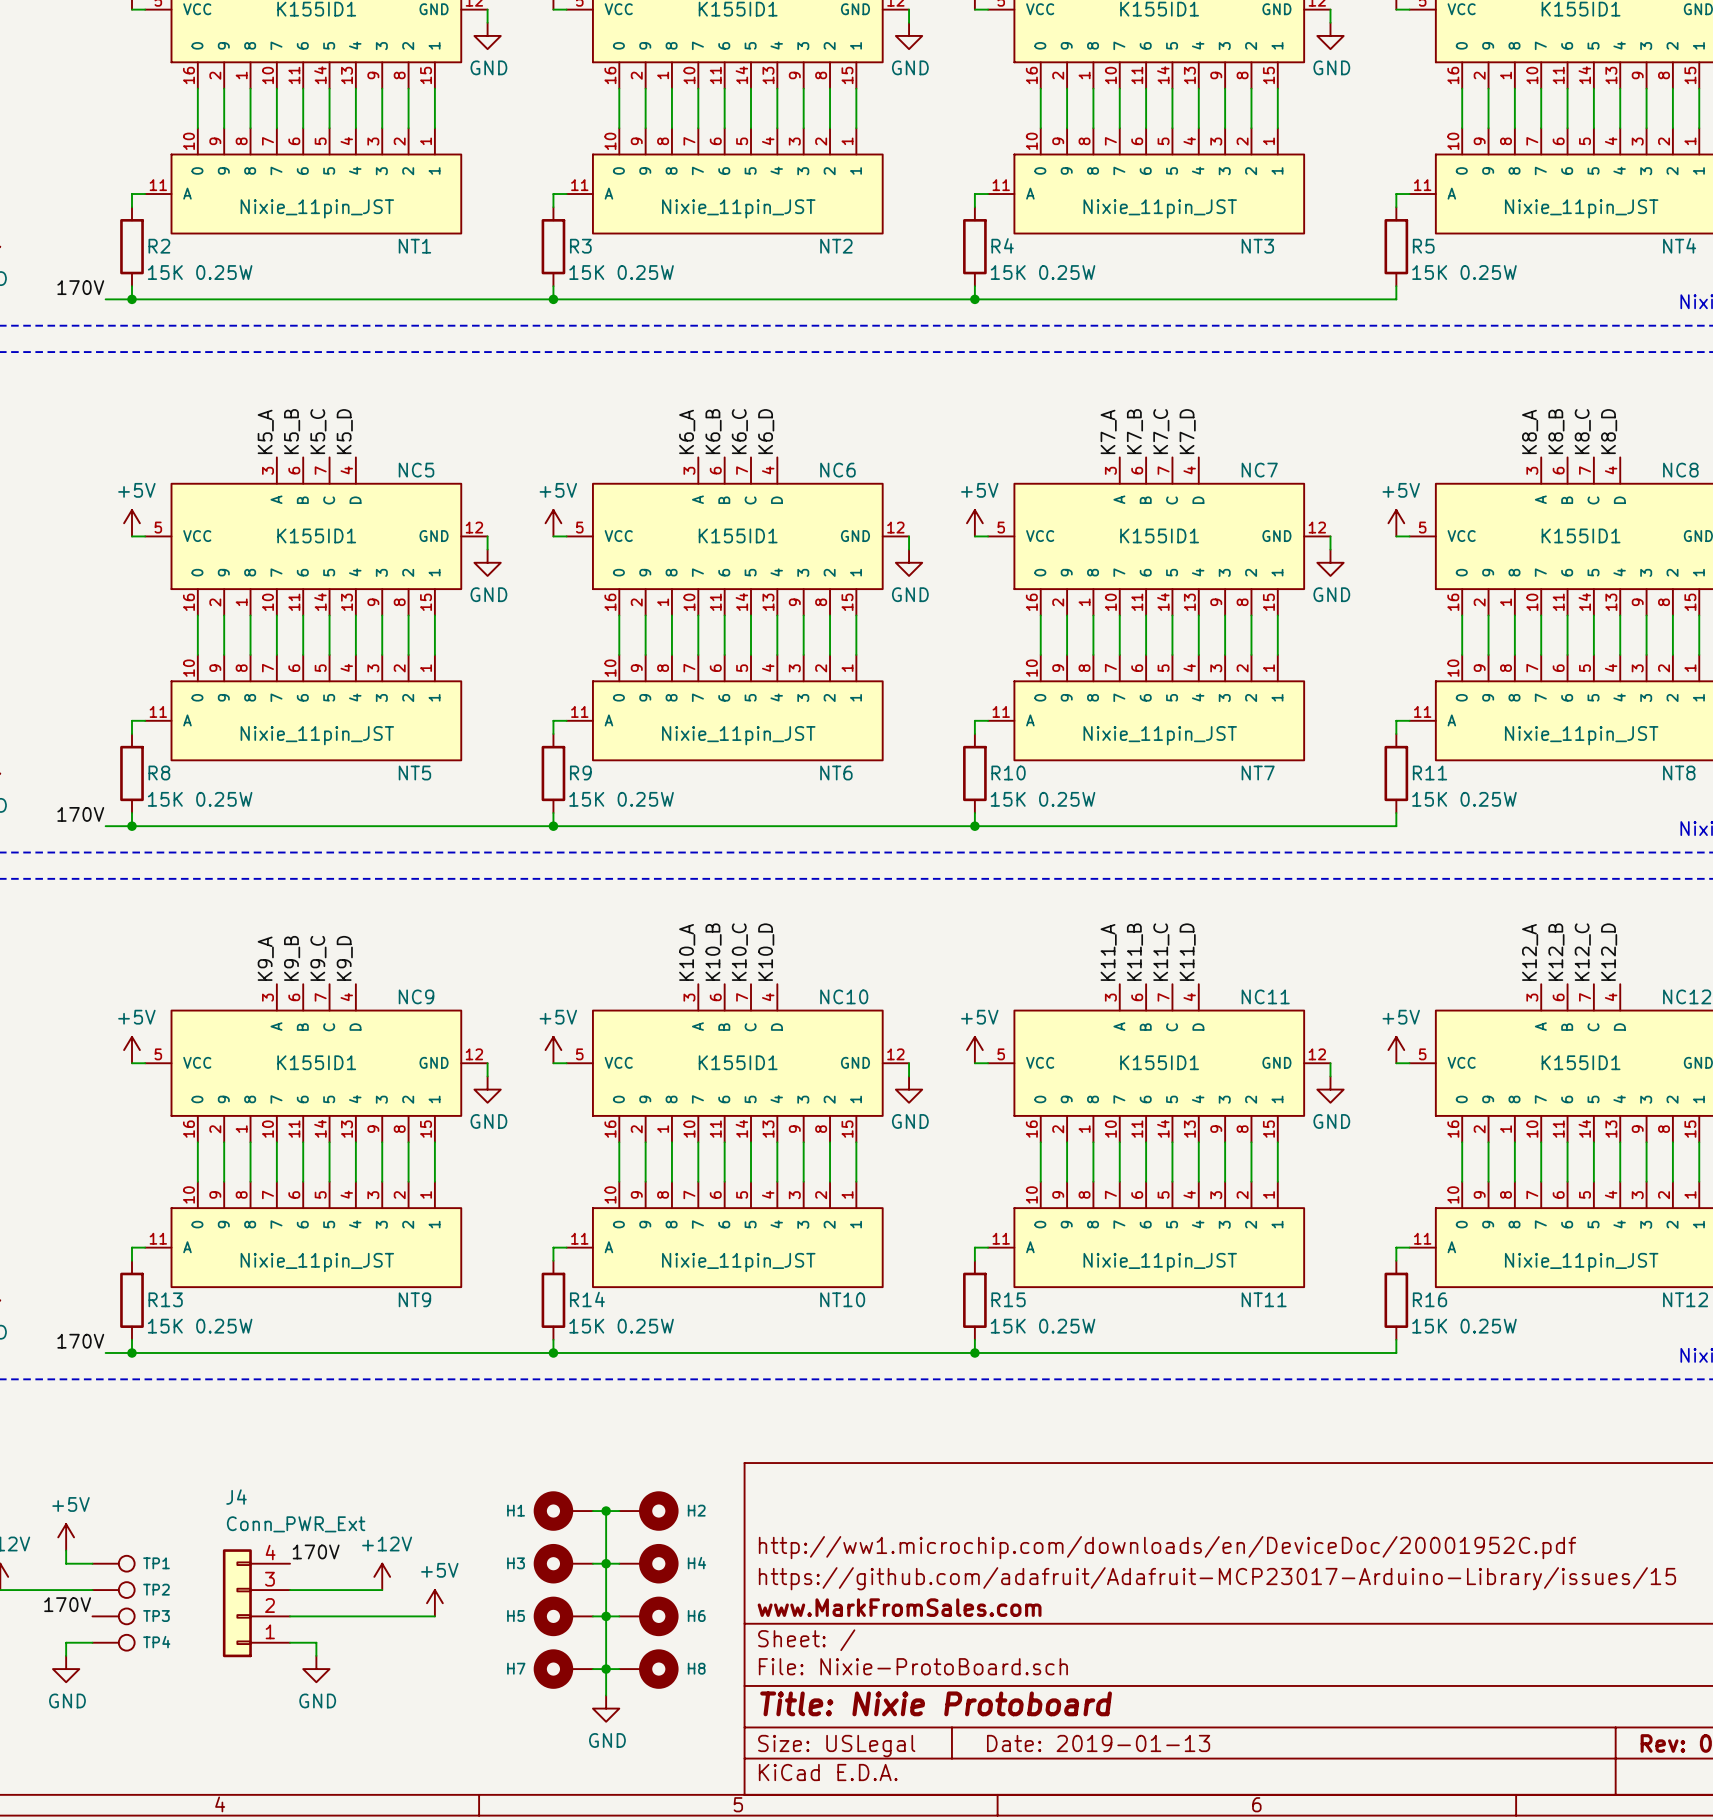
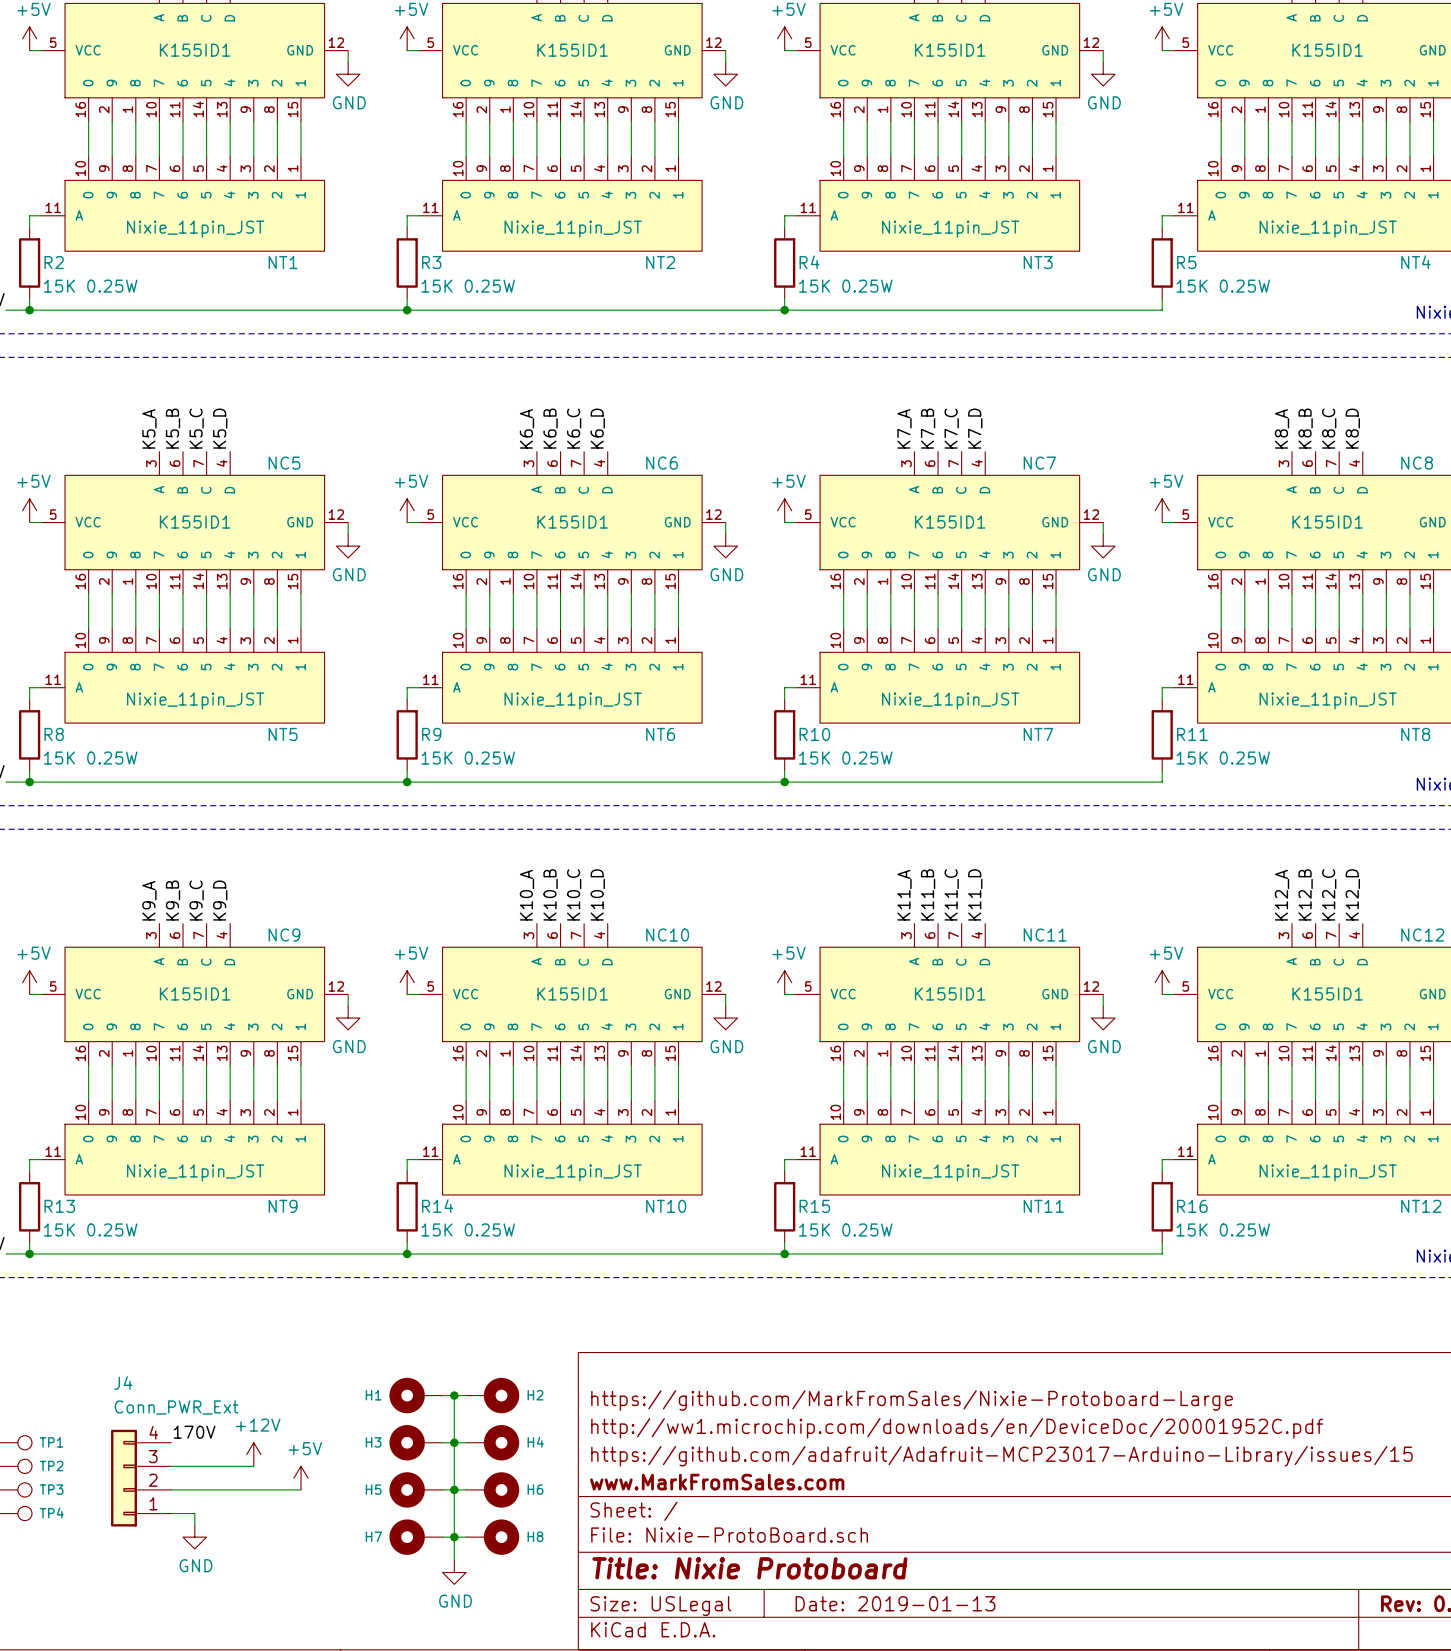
title block: none -> https://github.com/MarkFromSales/Nixie-Protoboard-Large (912, 1400)

